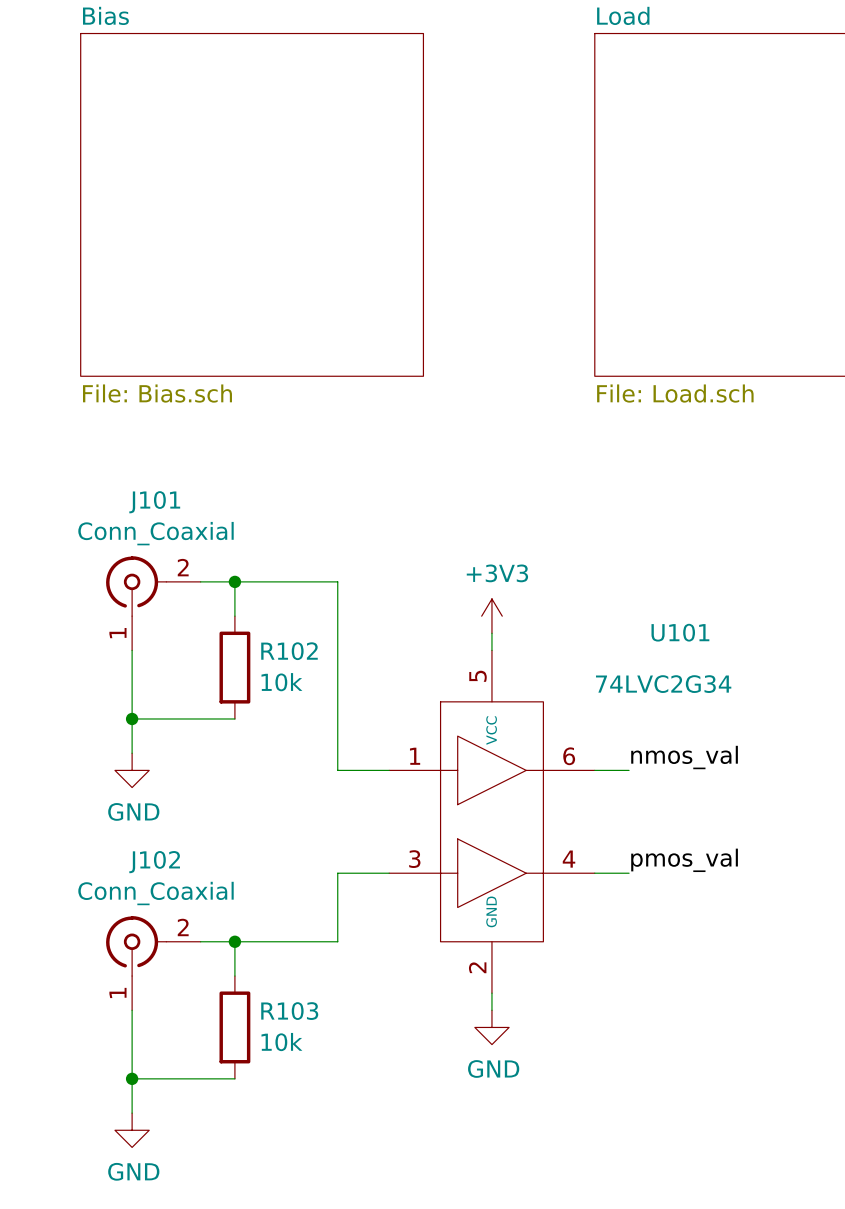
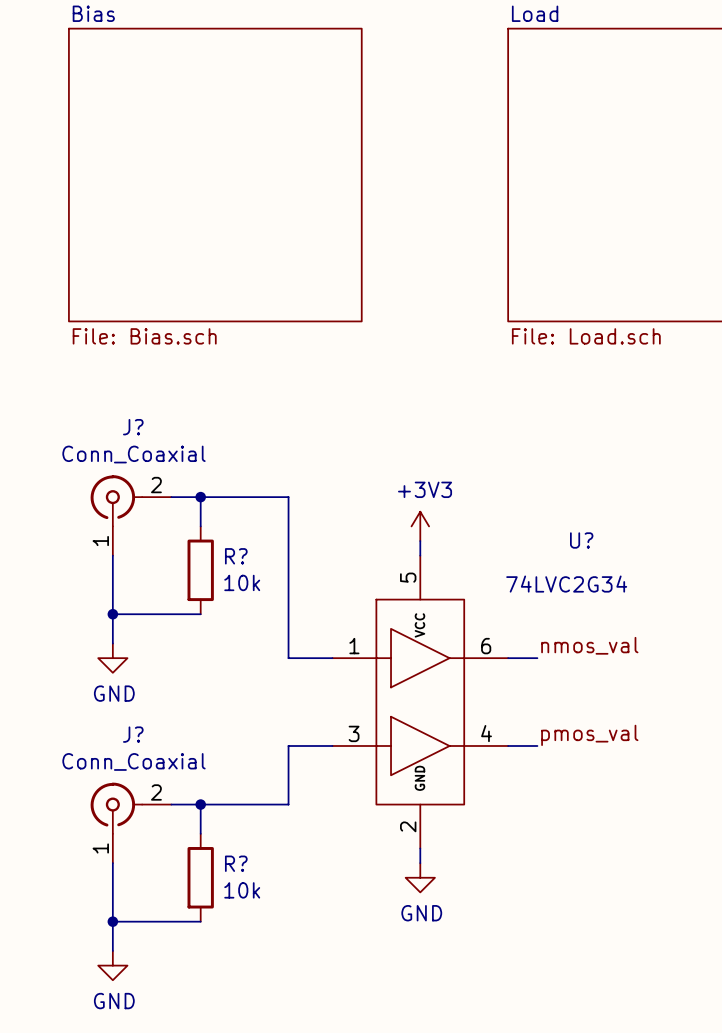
J101 name: J101 (154, 502) -> J? (133, 427)
U101 name: U101 (680, 632) -> U? (581, 540)
R102 name: R102 (289, 651) -> R? (236, 556)
J102 name: J102 (154, 862) -> J? (133, 734)
R103 name: R103 (289, 1011) -> R? (236, 863)

